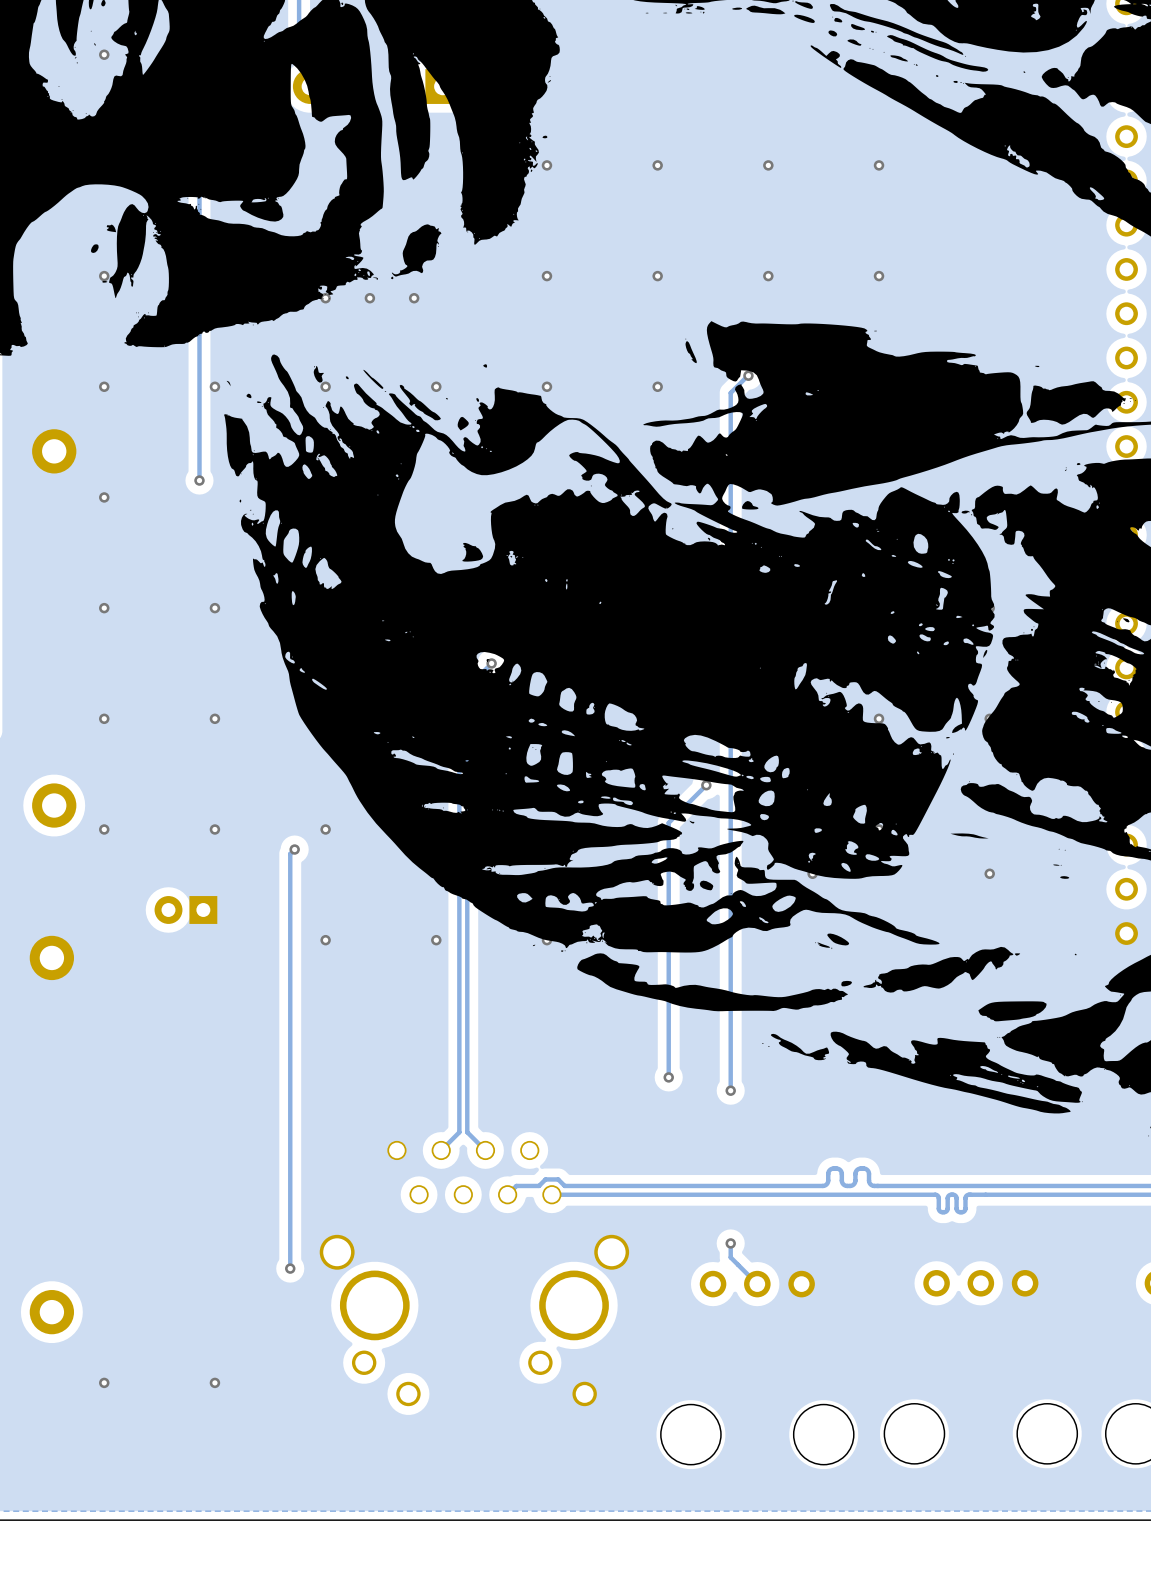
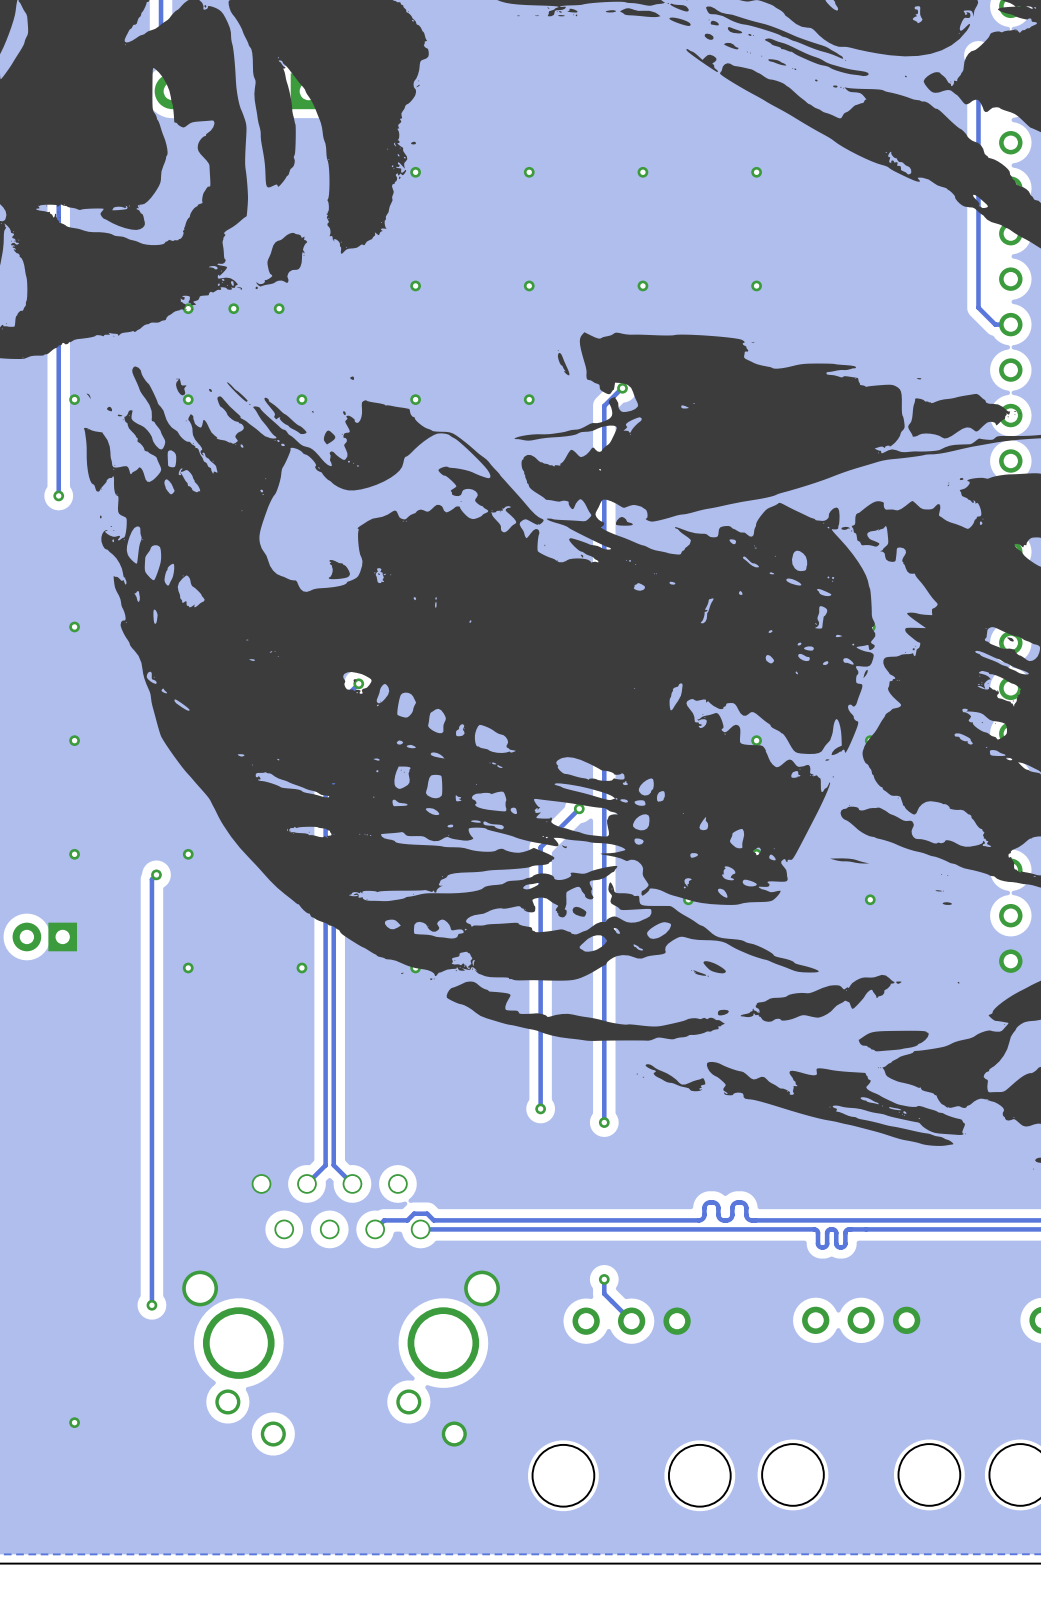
track: none -> (978, 55) (978, 307) (995, 324) (1010, 324)

